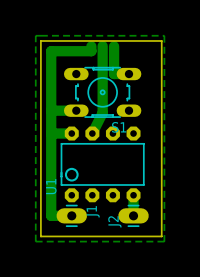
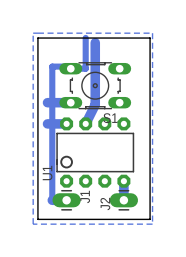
bottom track: (91, 46) (91, 51) (51, 51) (51, 215) (56, 215) -> (85, 37) (85, 68) (52, 66) (52, 200)
bottom track: (114, 46) (114, 74) (129, 74) -> none

